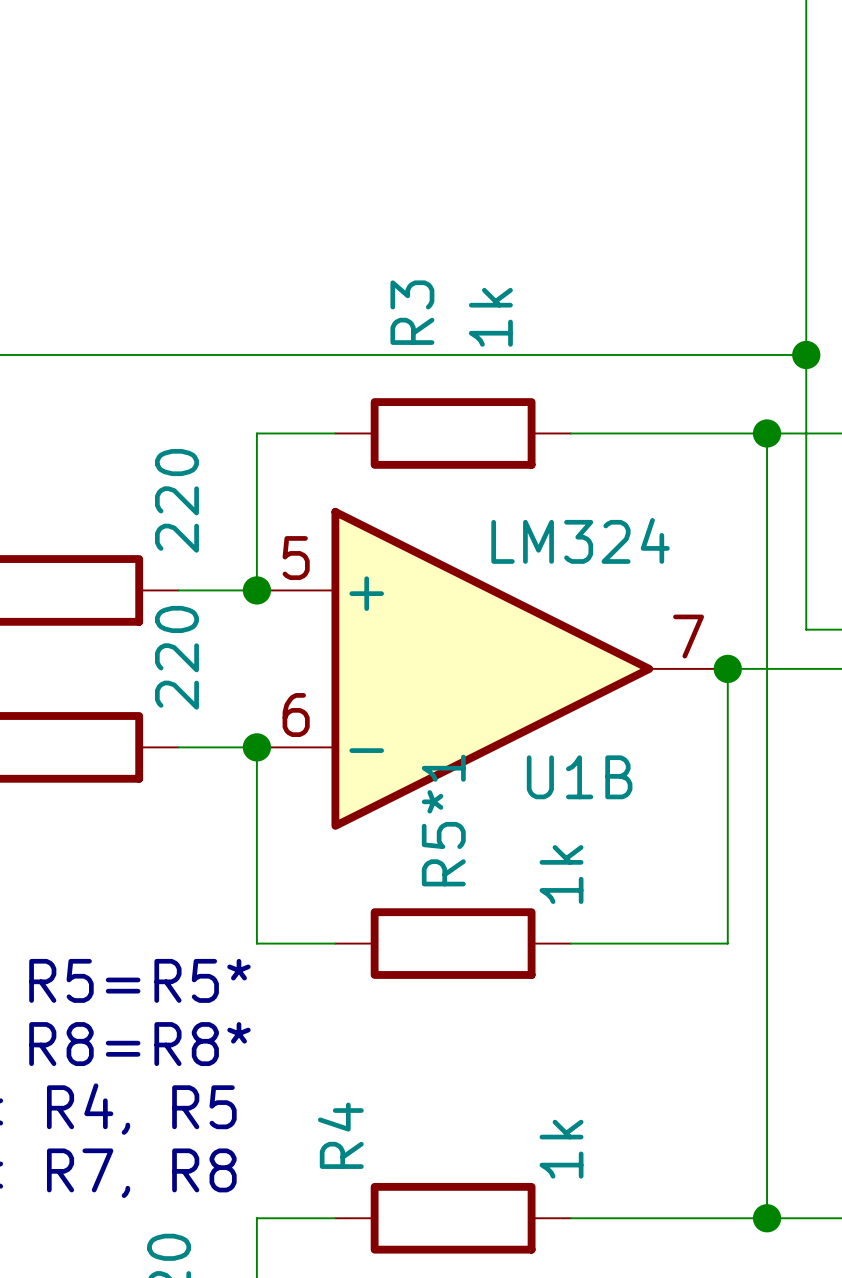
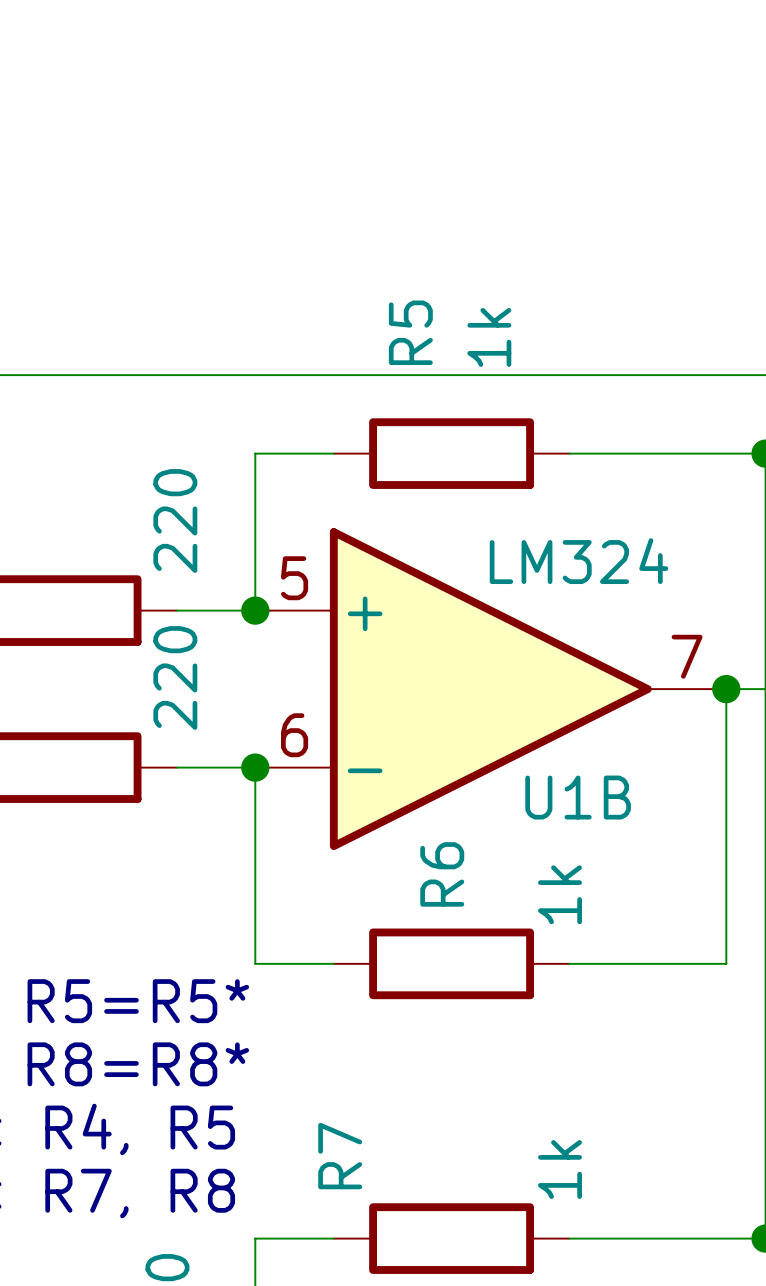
R3 name: R3 (412, 312) -> R5 (410, 332)
R5*1 name: R5*1 (443, 820) -> R6 (442, 874)
R4 name: R4 (340, 1135) -> R7 (340, 1156)

